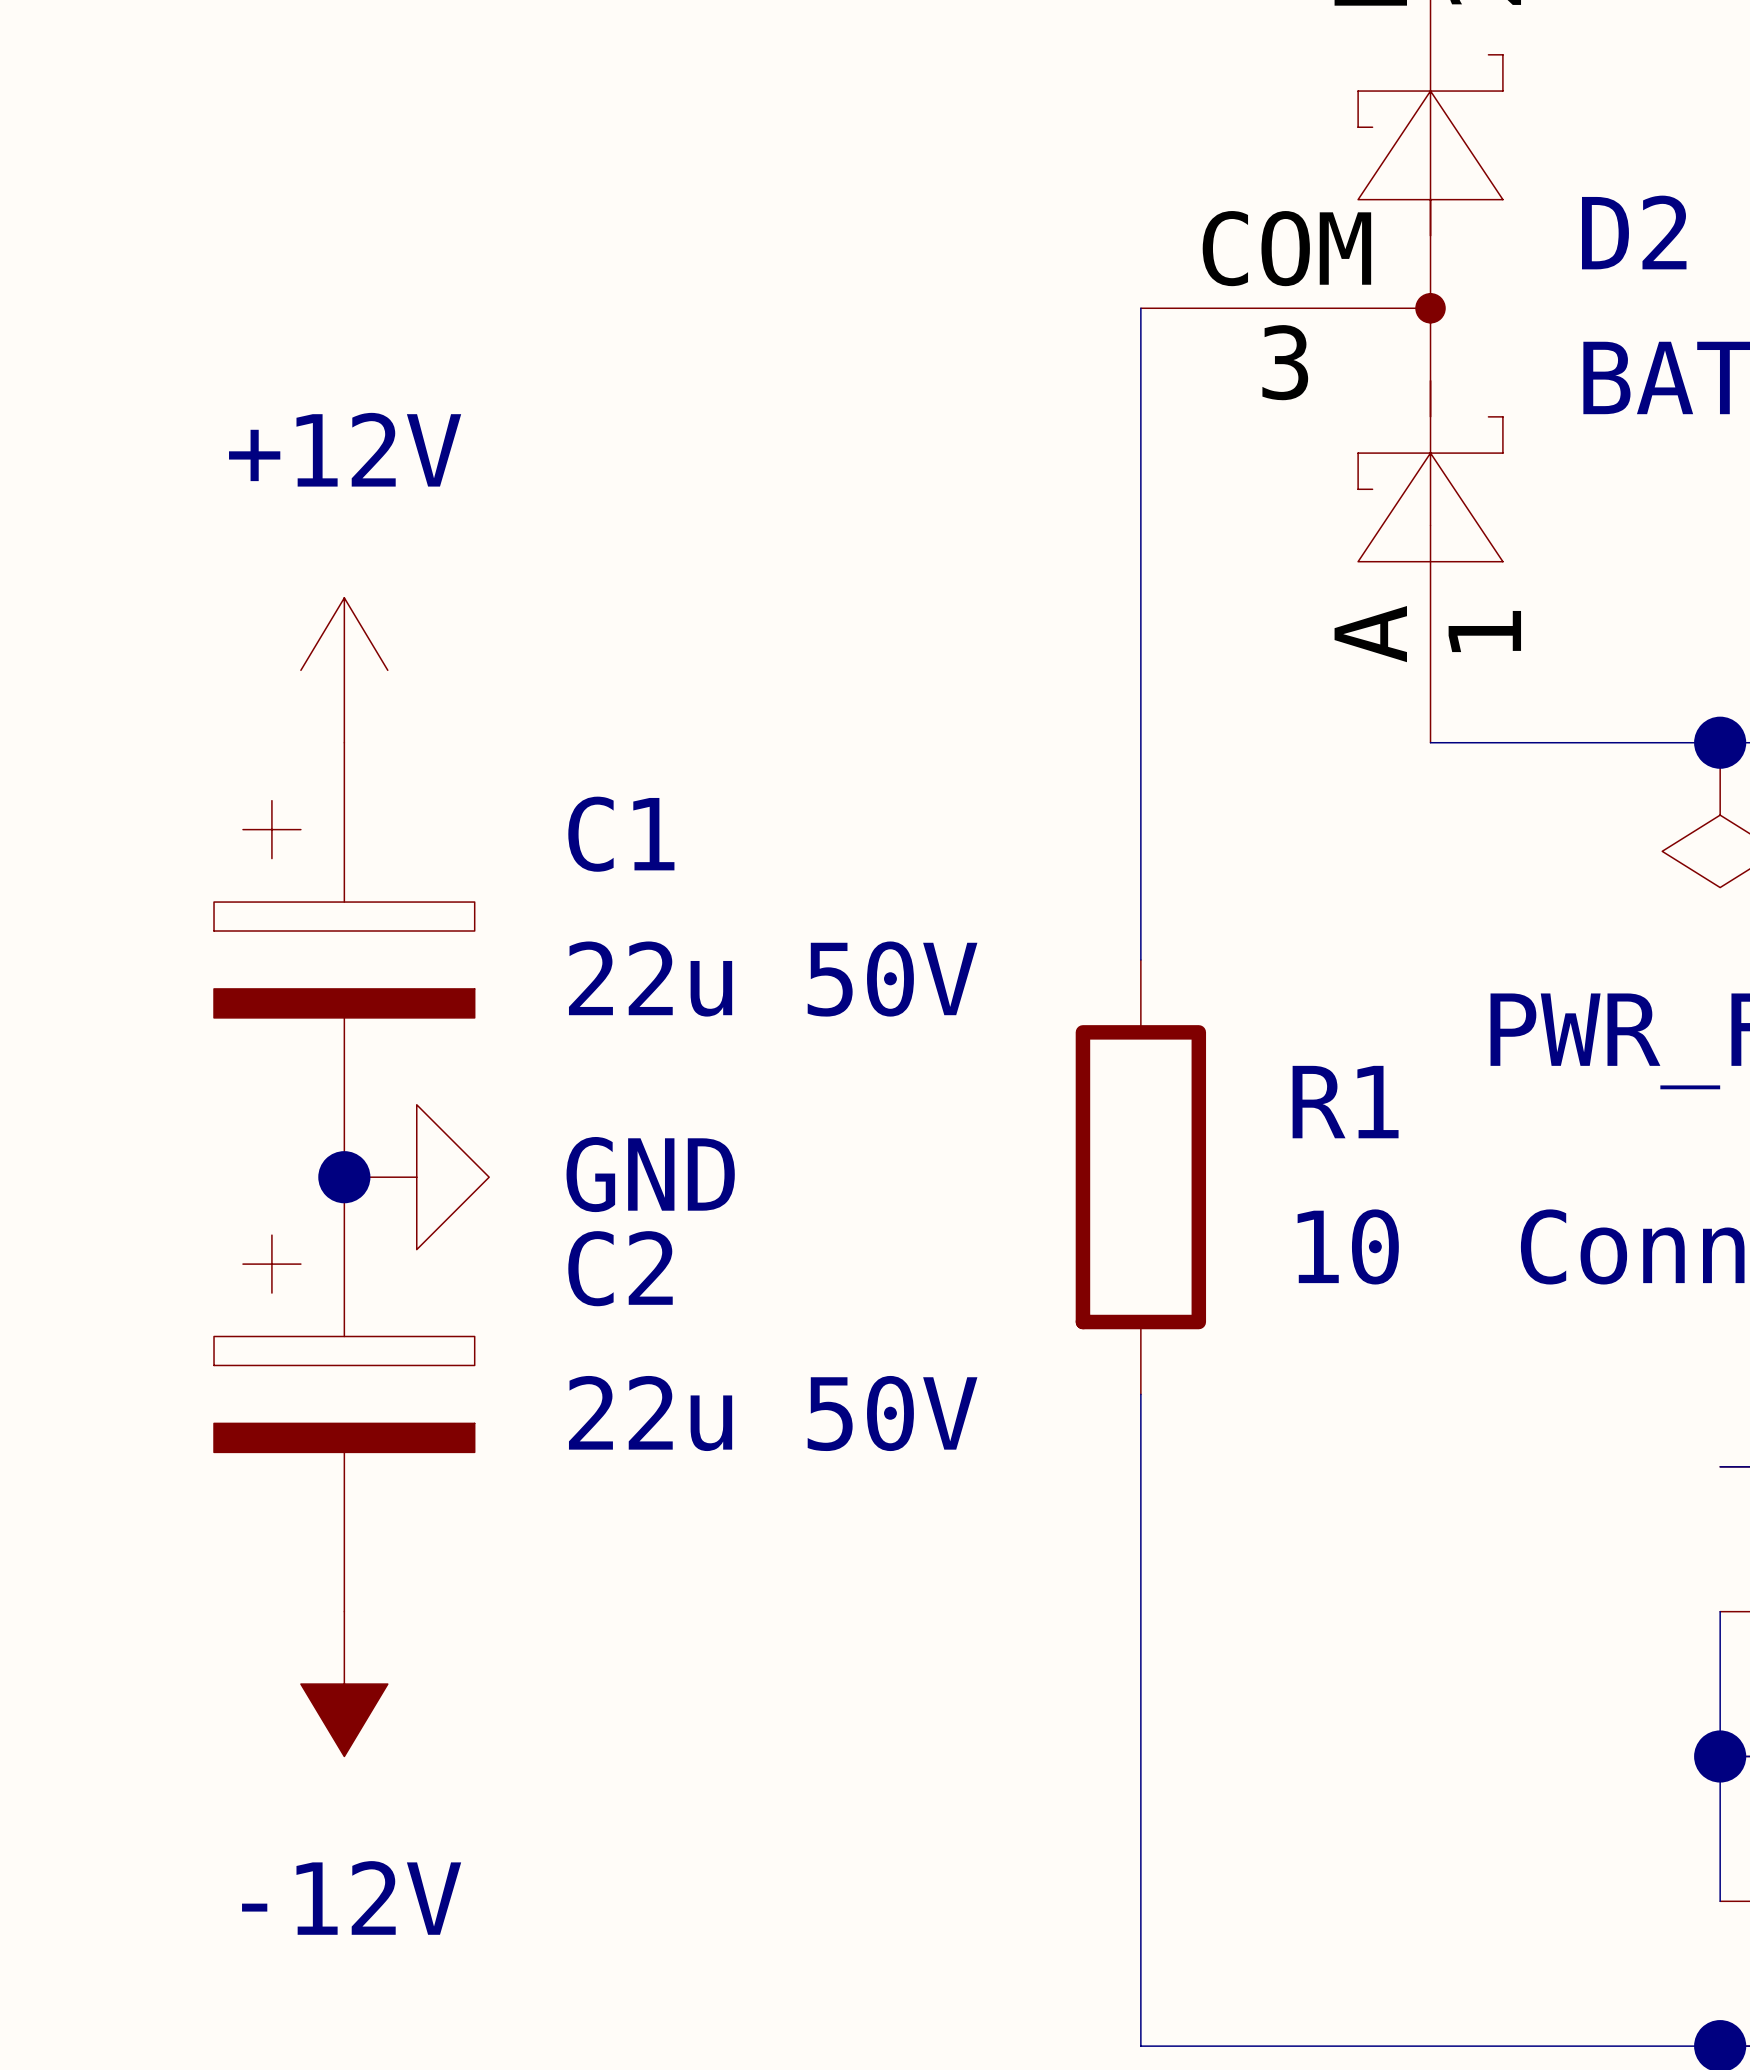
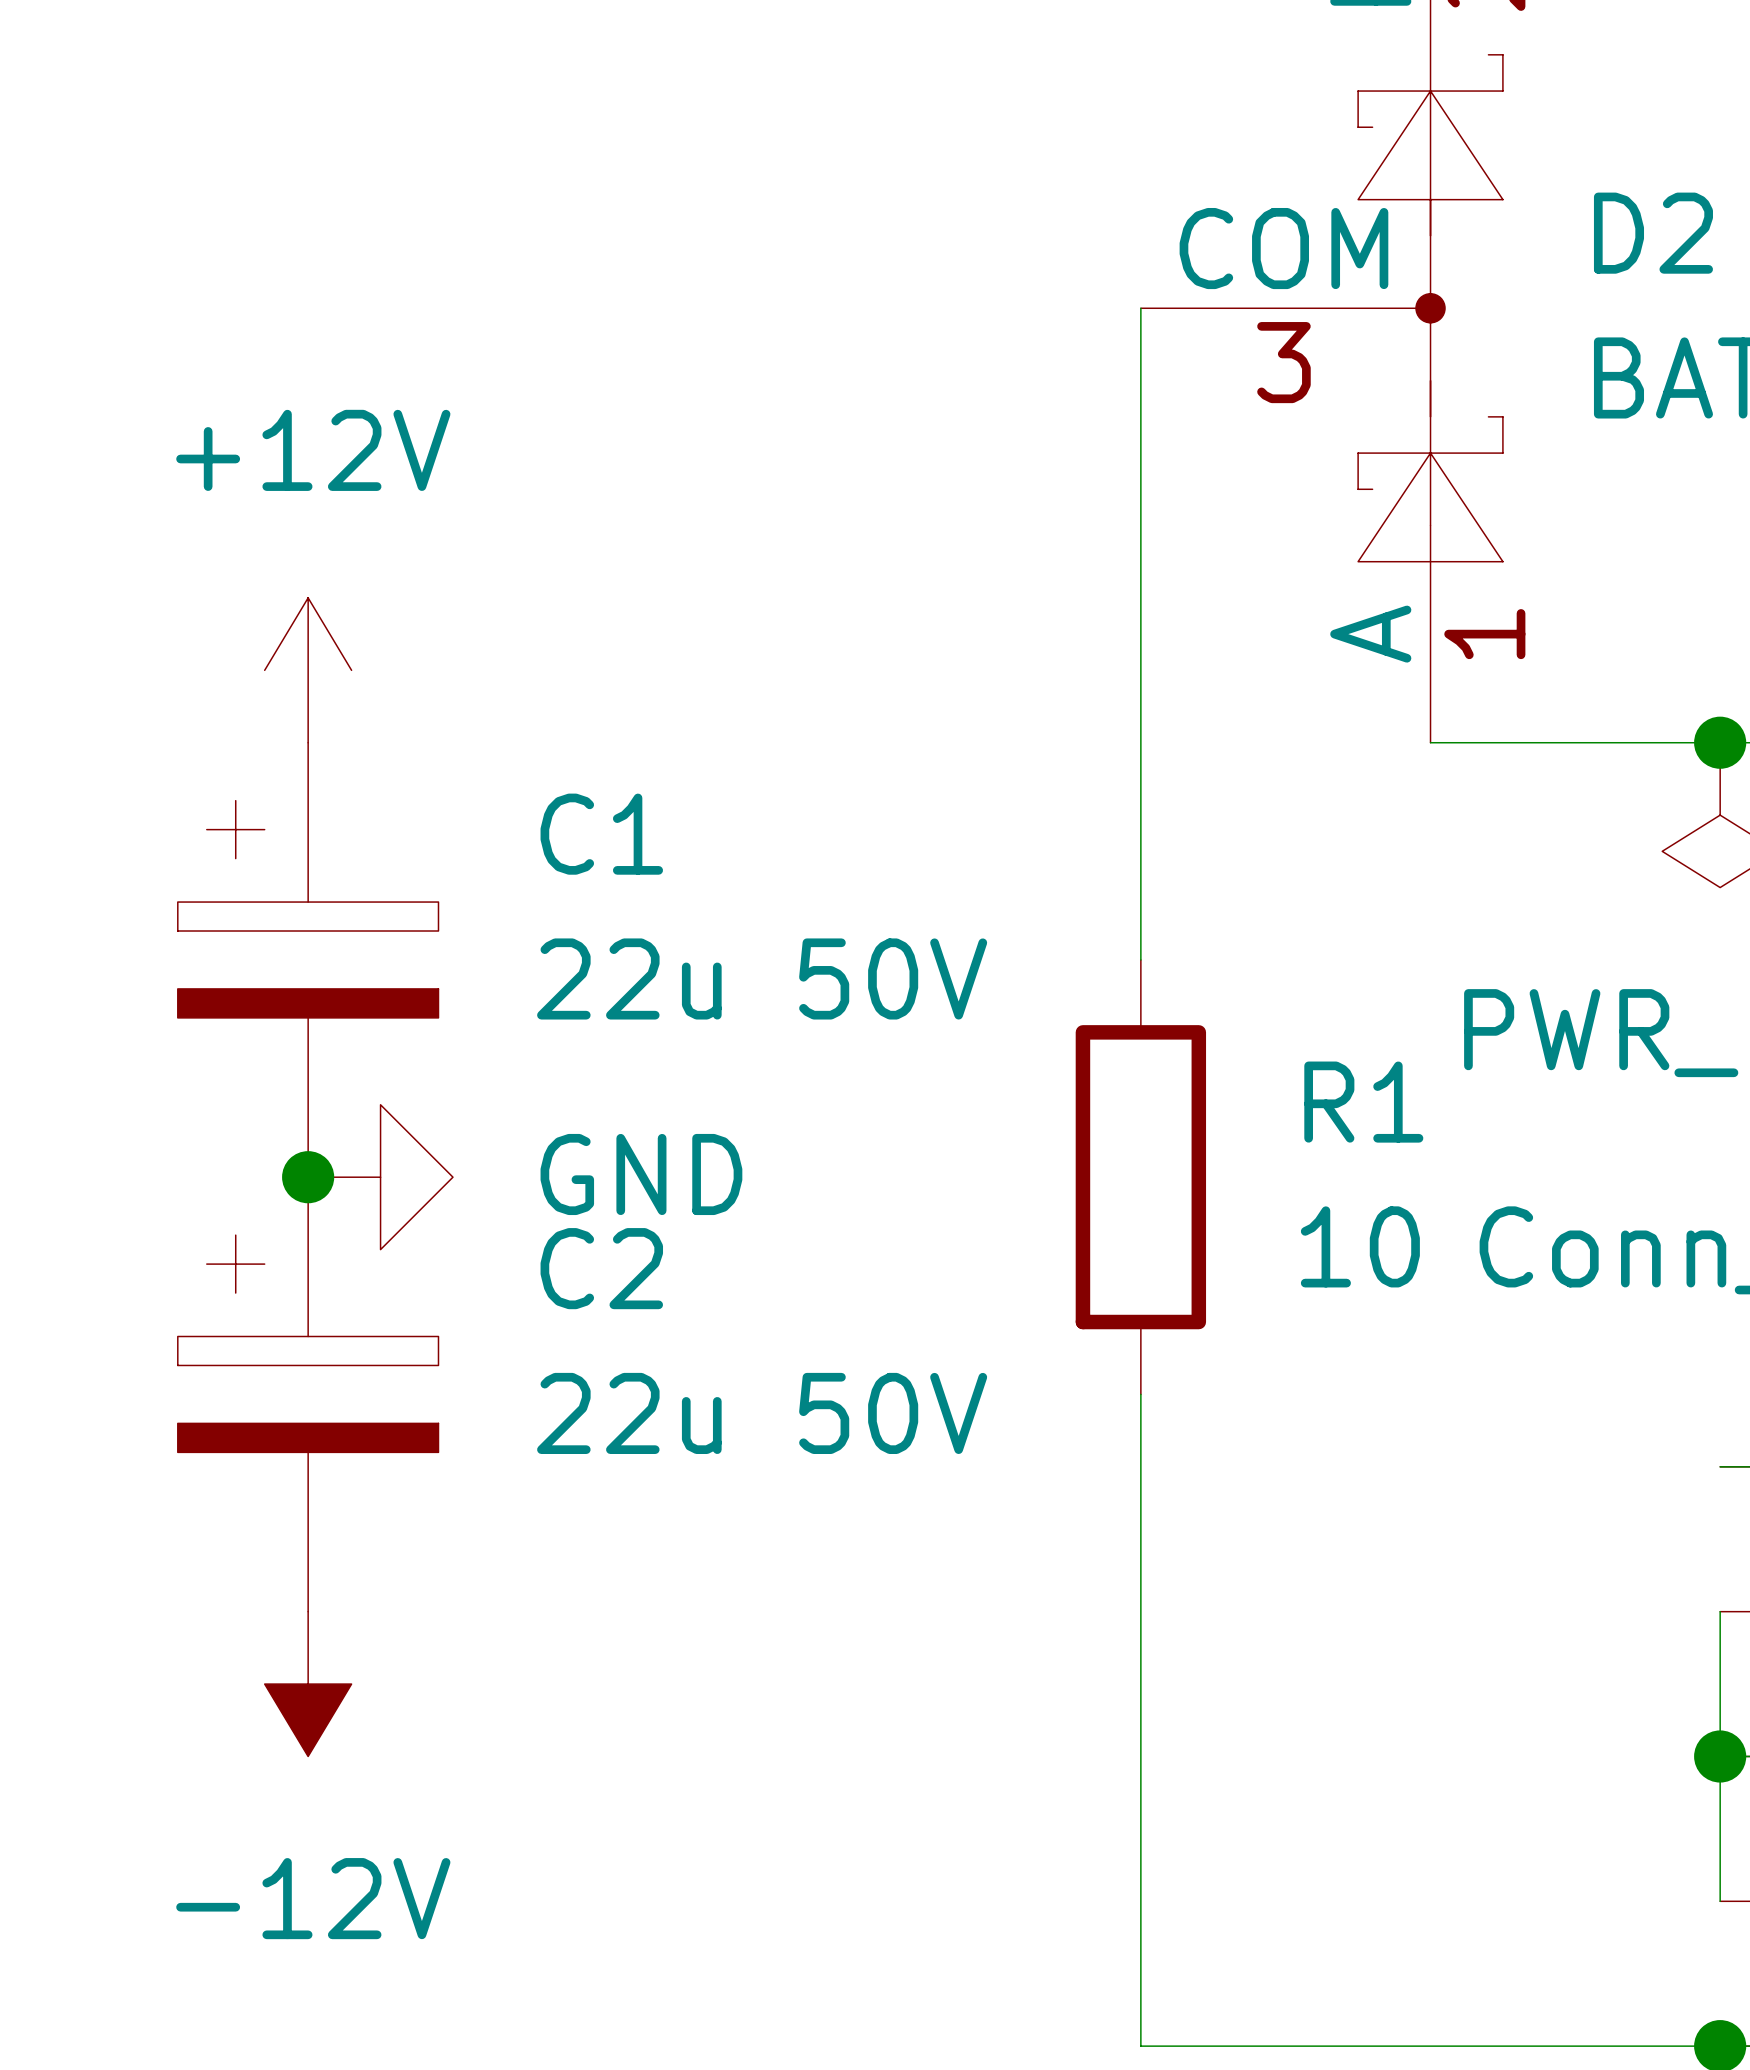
power symbol position: +12V (344, 670) -> +12V (308, 670)
C1 position: (344, 959) -> (308, 959)
junction position: (344, 1177) -> (308, 1177)
power symbol position: GND (416, 1177) -> GND (380, 1177)
C2 position: (344, 1394) -> (308, 1394)
power symbol position: -12V (344, 1684) -> -12V (308, 1684)

